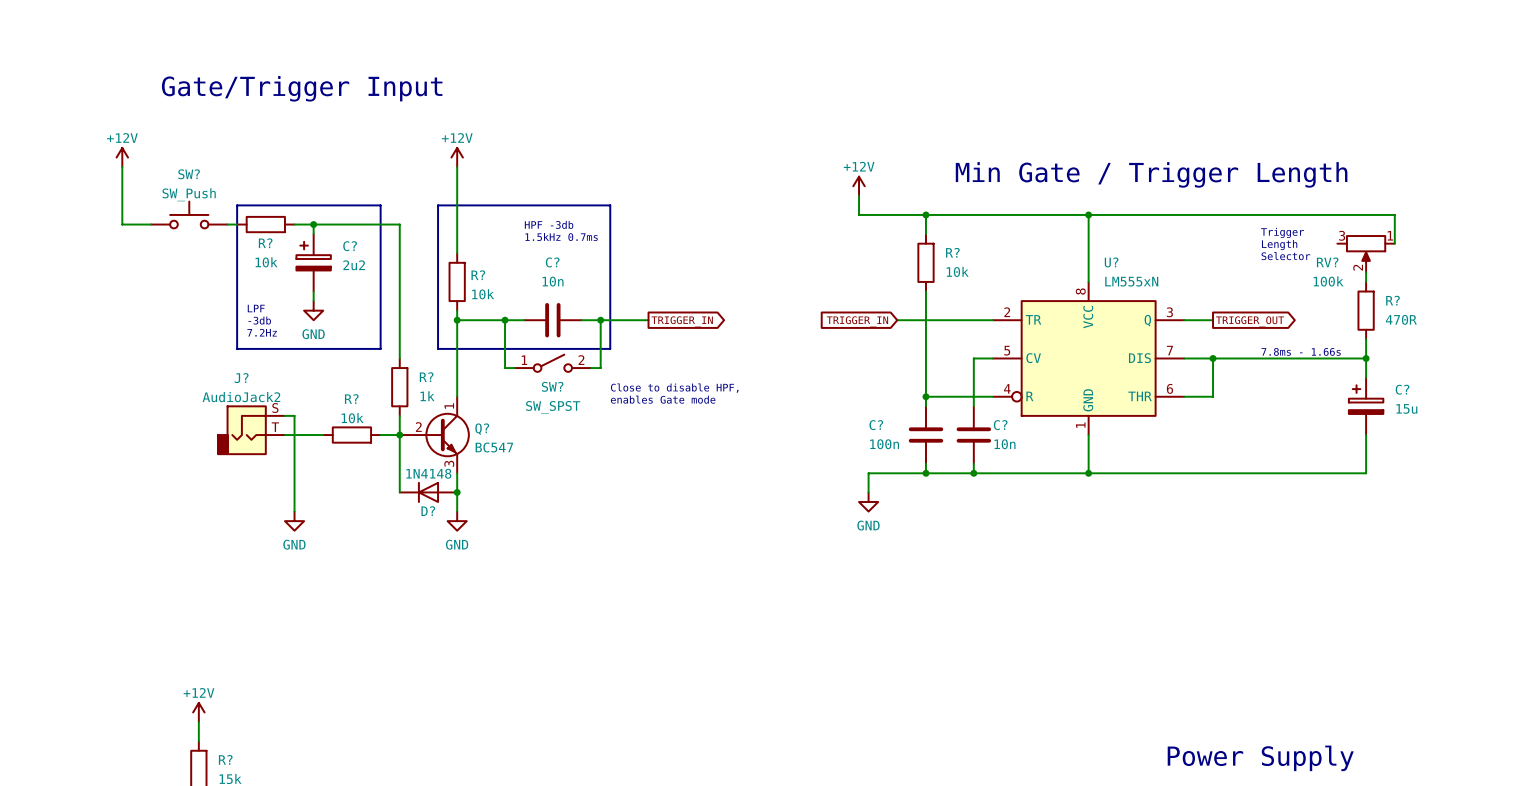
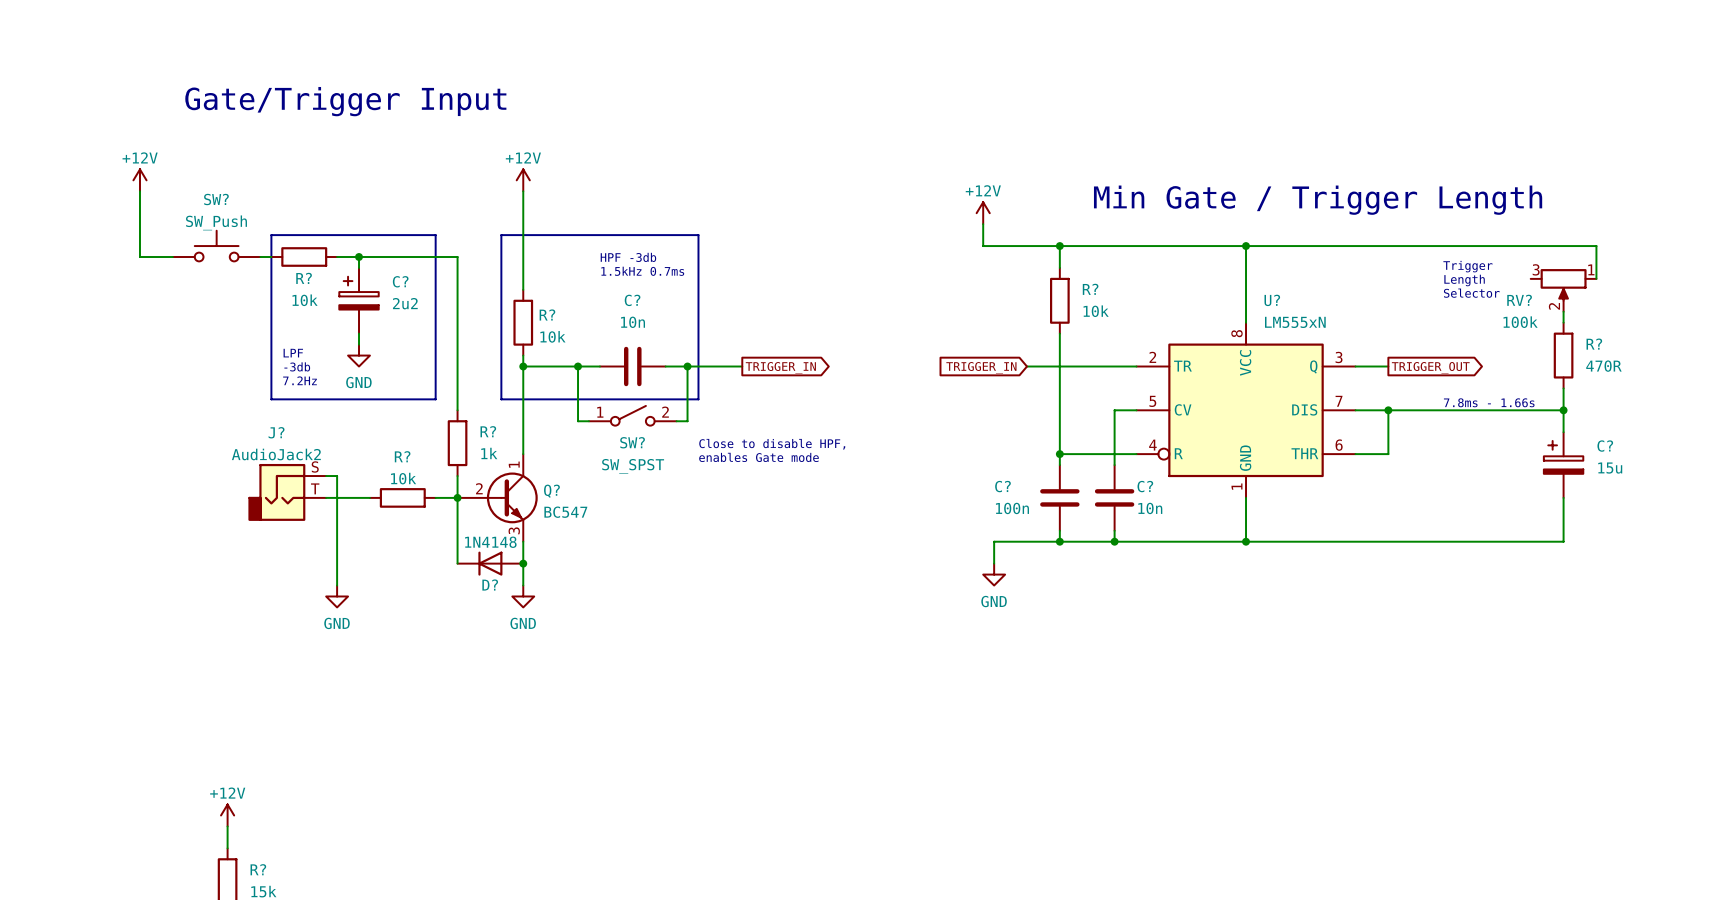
text: Power Supply (1260, 758) -> none

